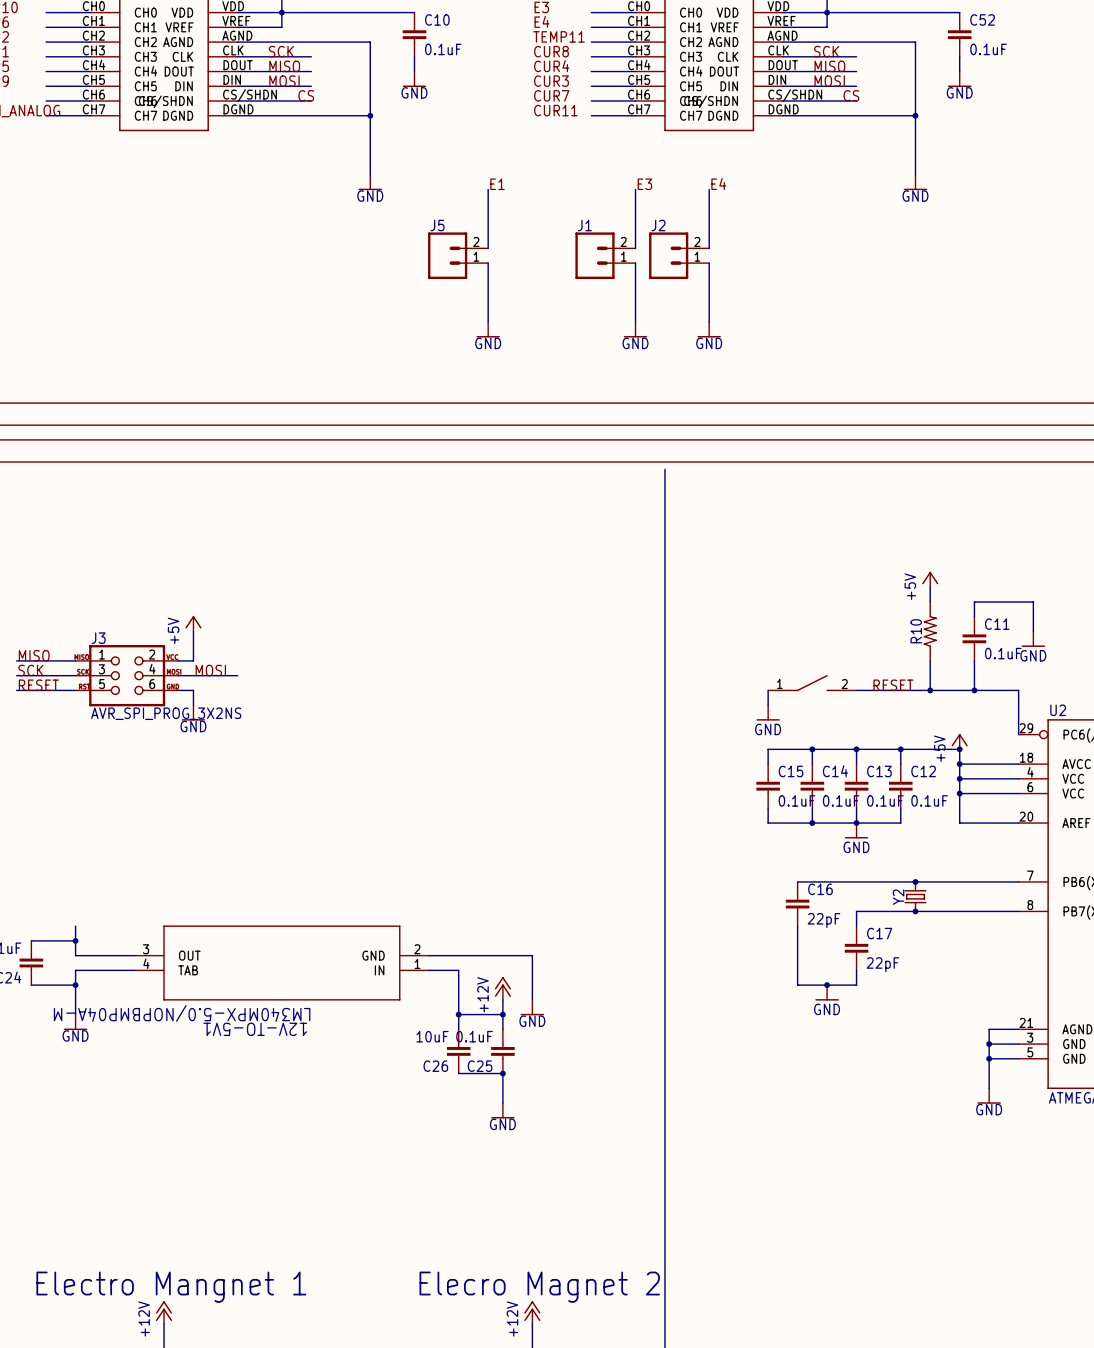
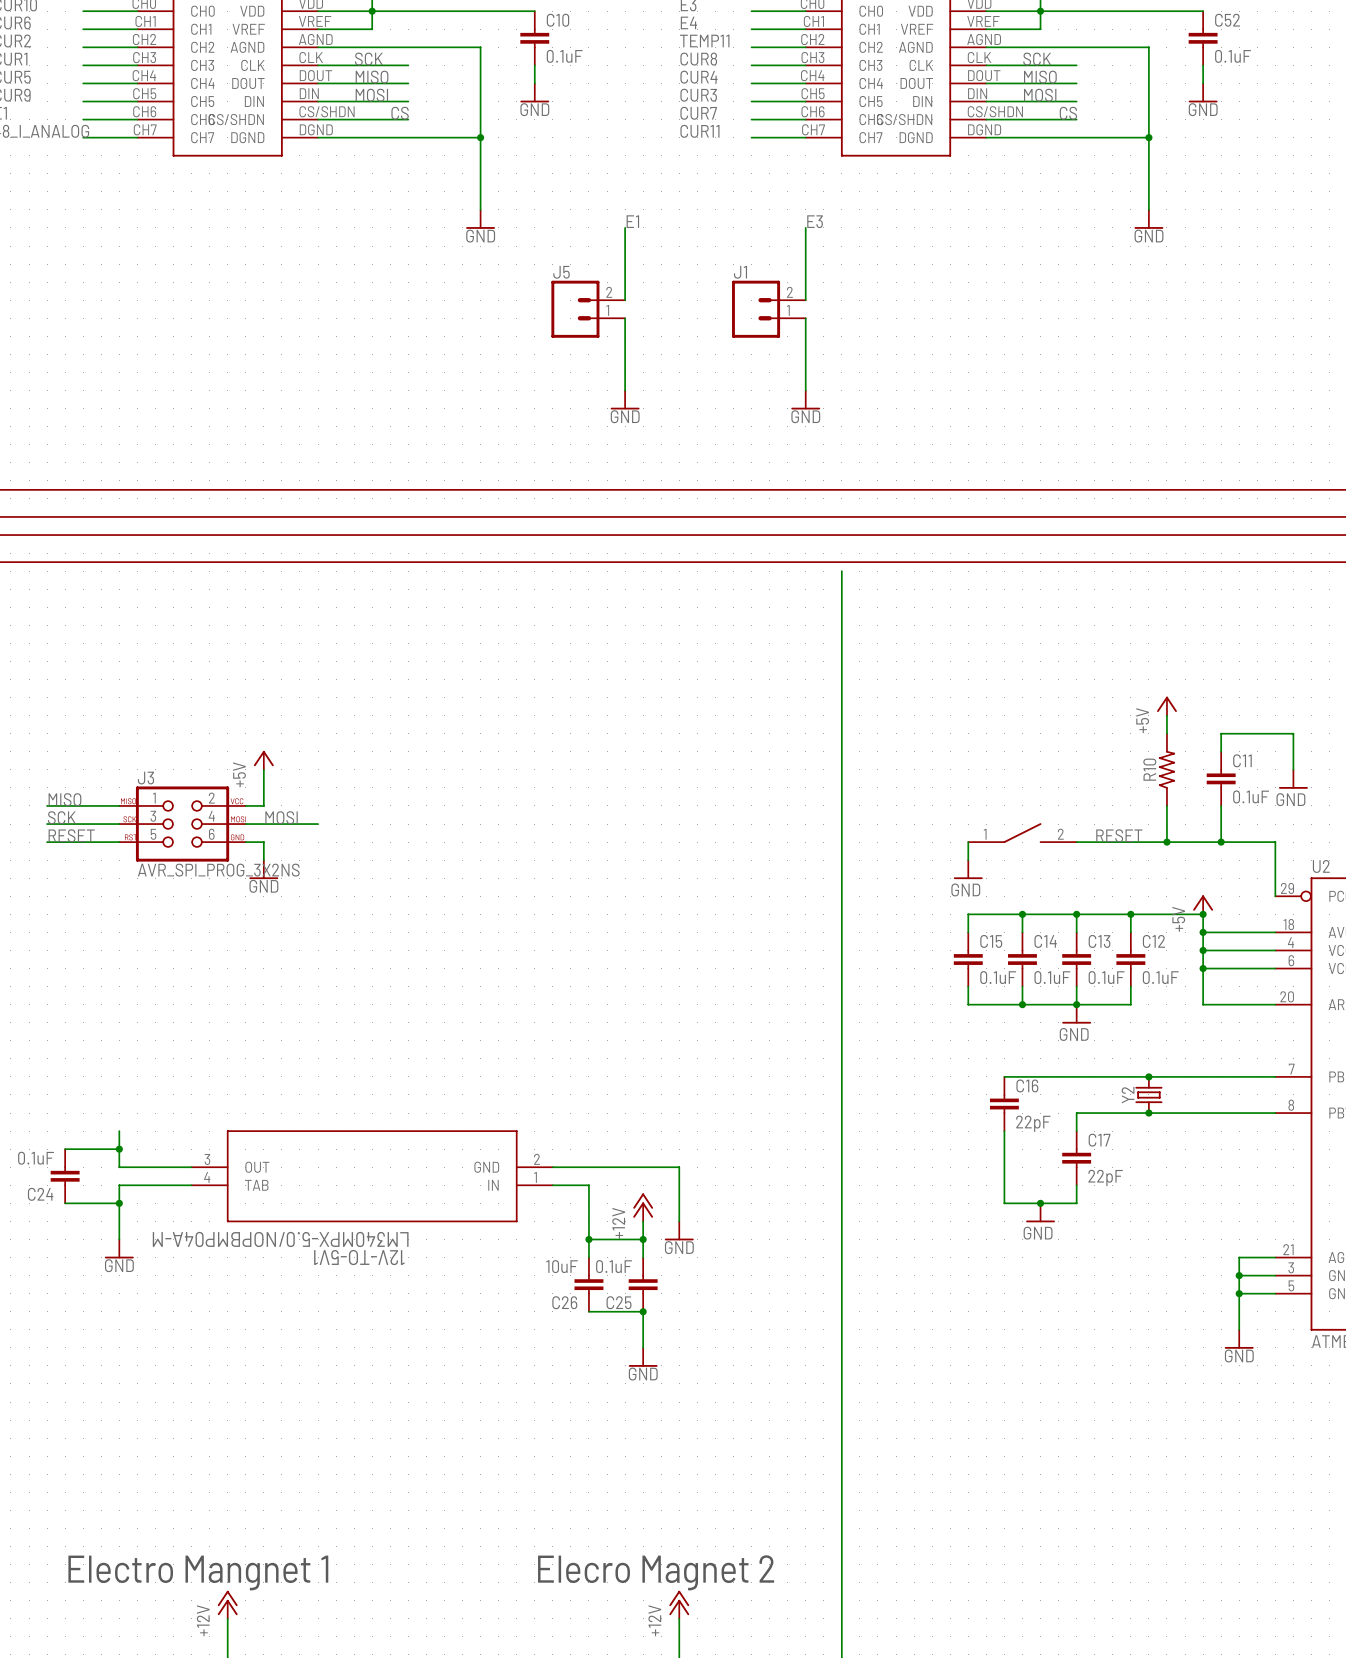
label: E4 (718, 184) -> none
wire: (709, 189) (709, 248) -> none
J2: (679, 255) -> none
wire: (709, 263) (709, 322) -> none
power symbol: GND (709, 329) -> none

